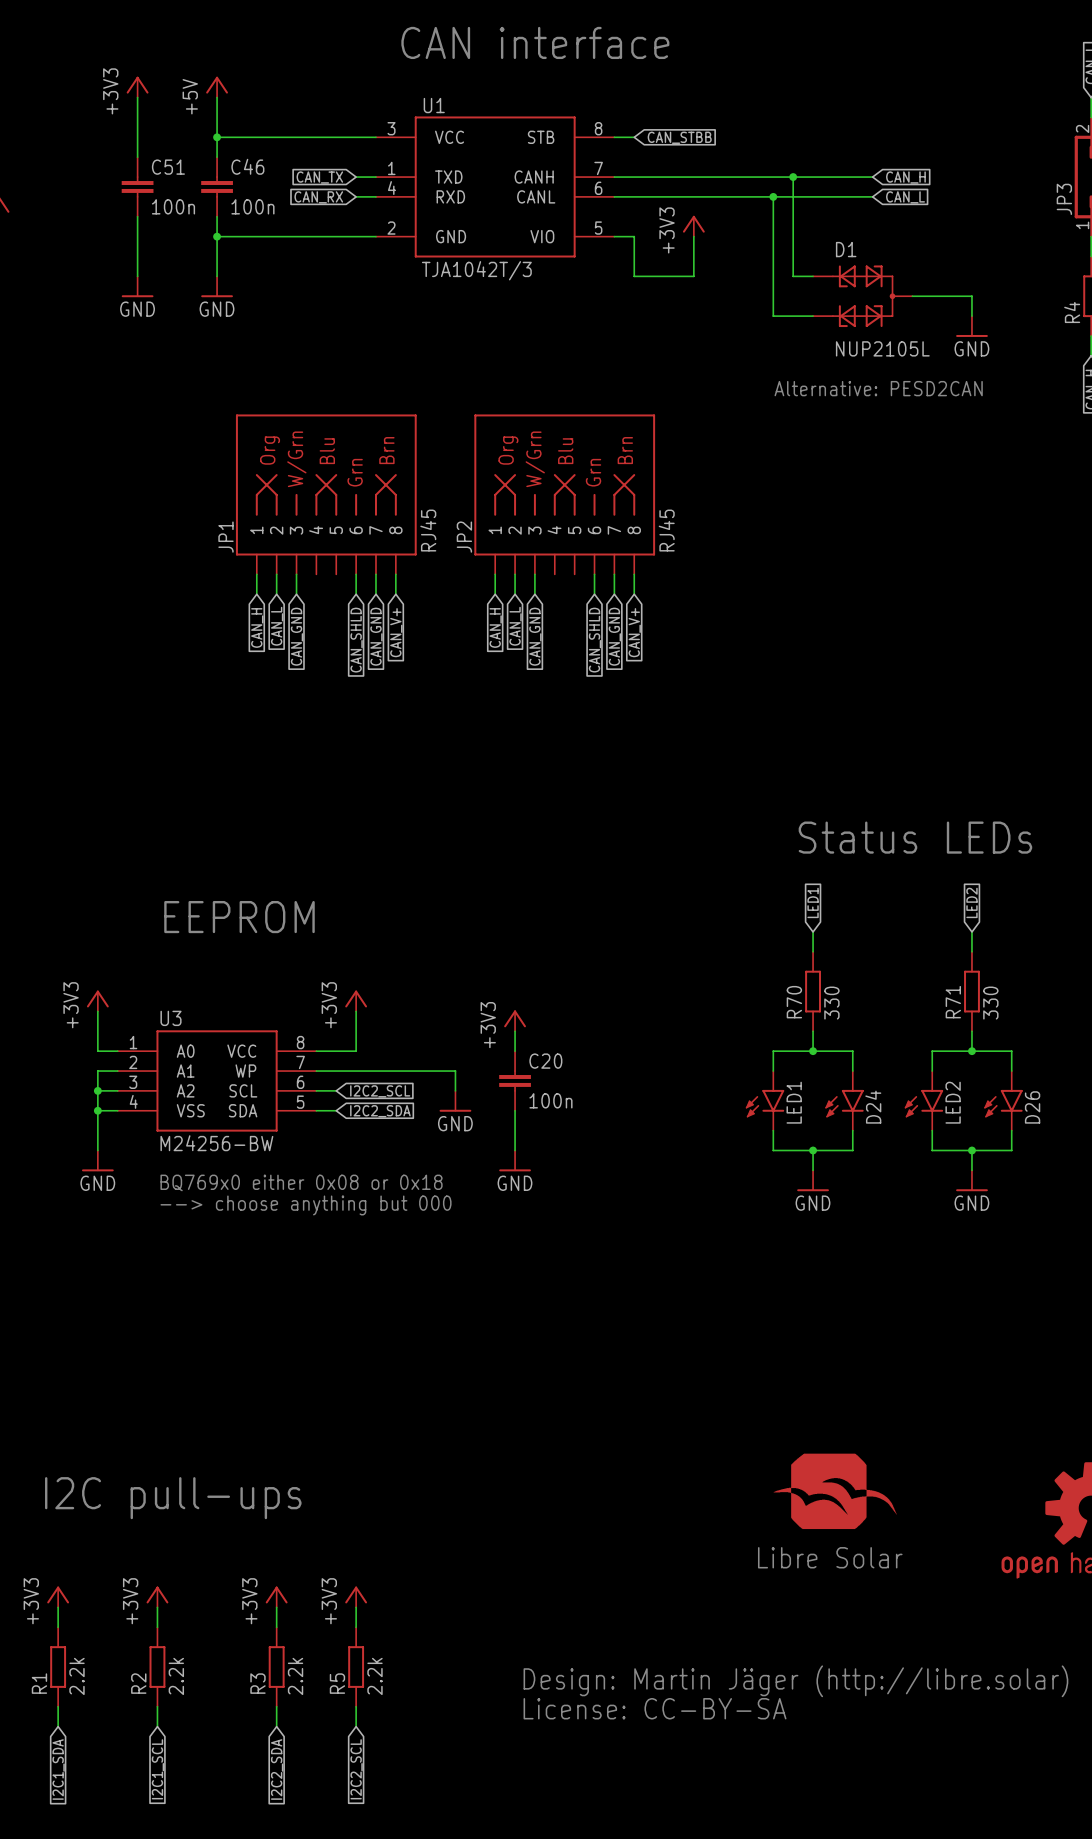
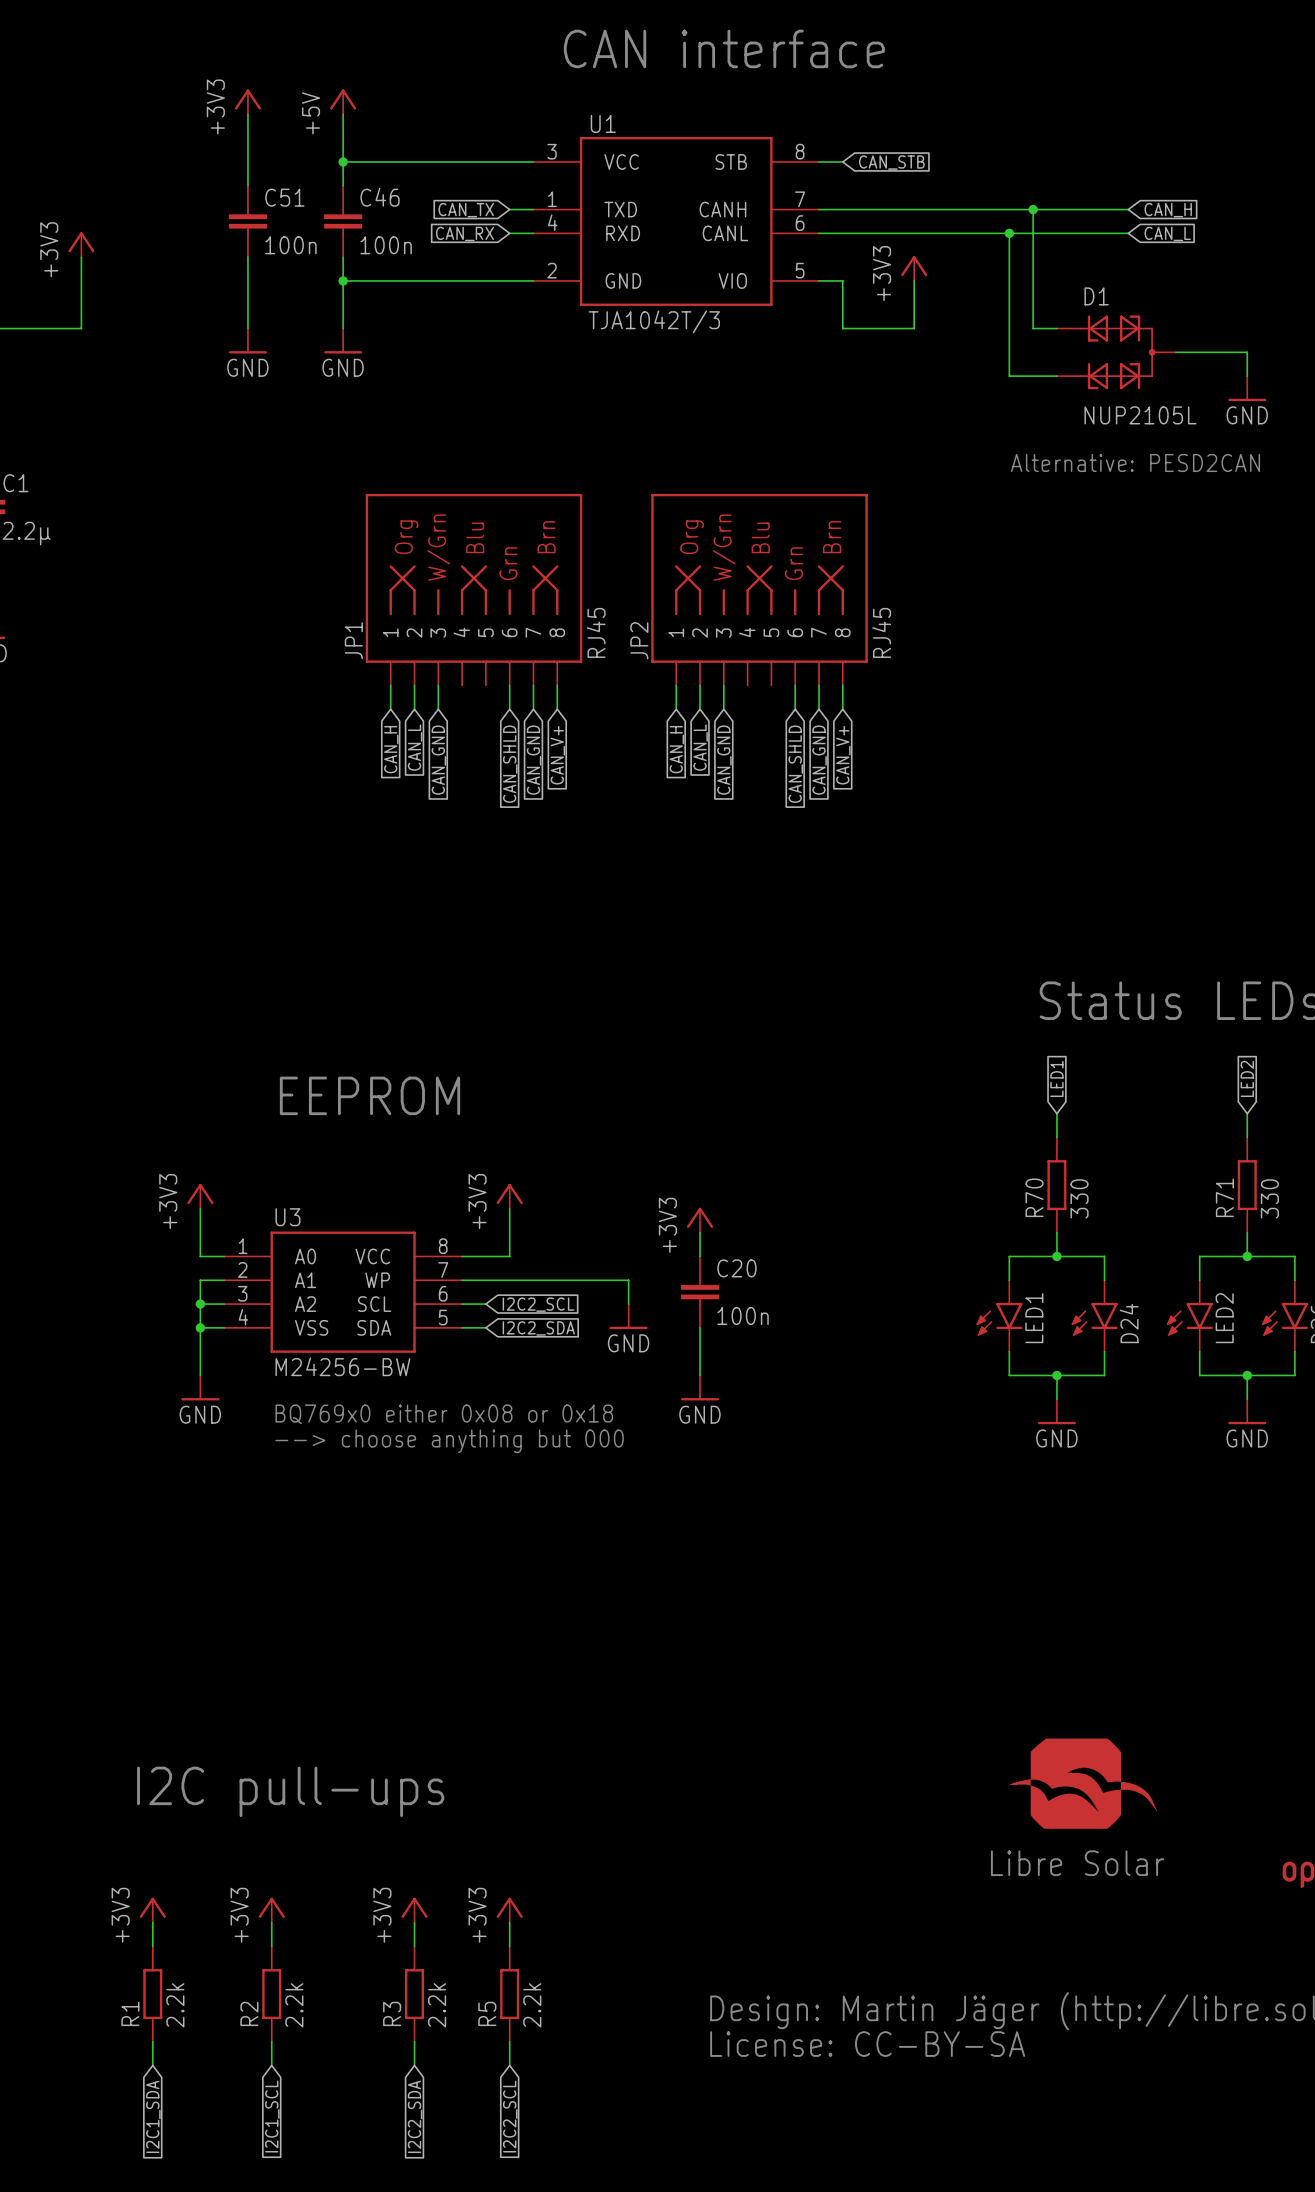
global label: CAN_STBB (679, 137) -> CAN_STB (891, 162)

